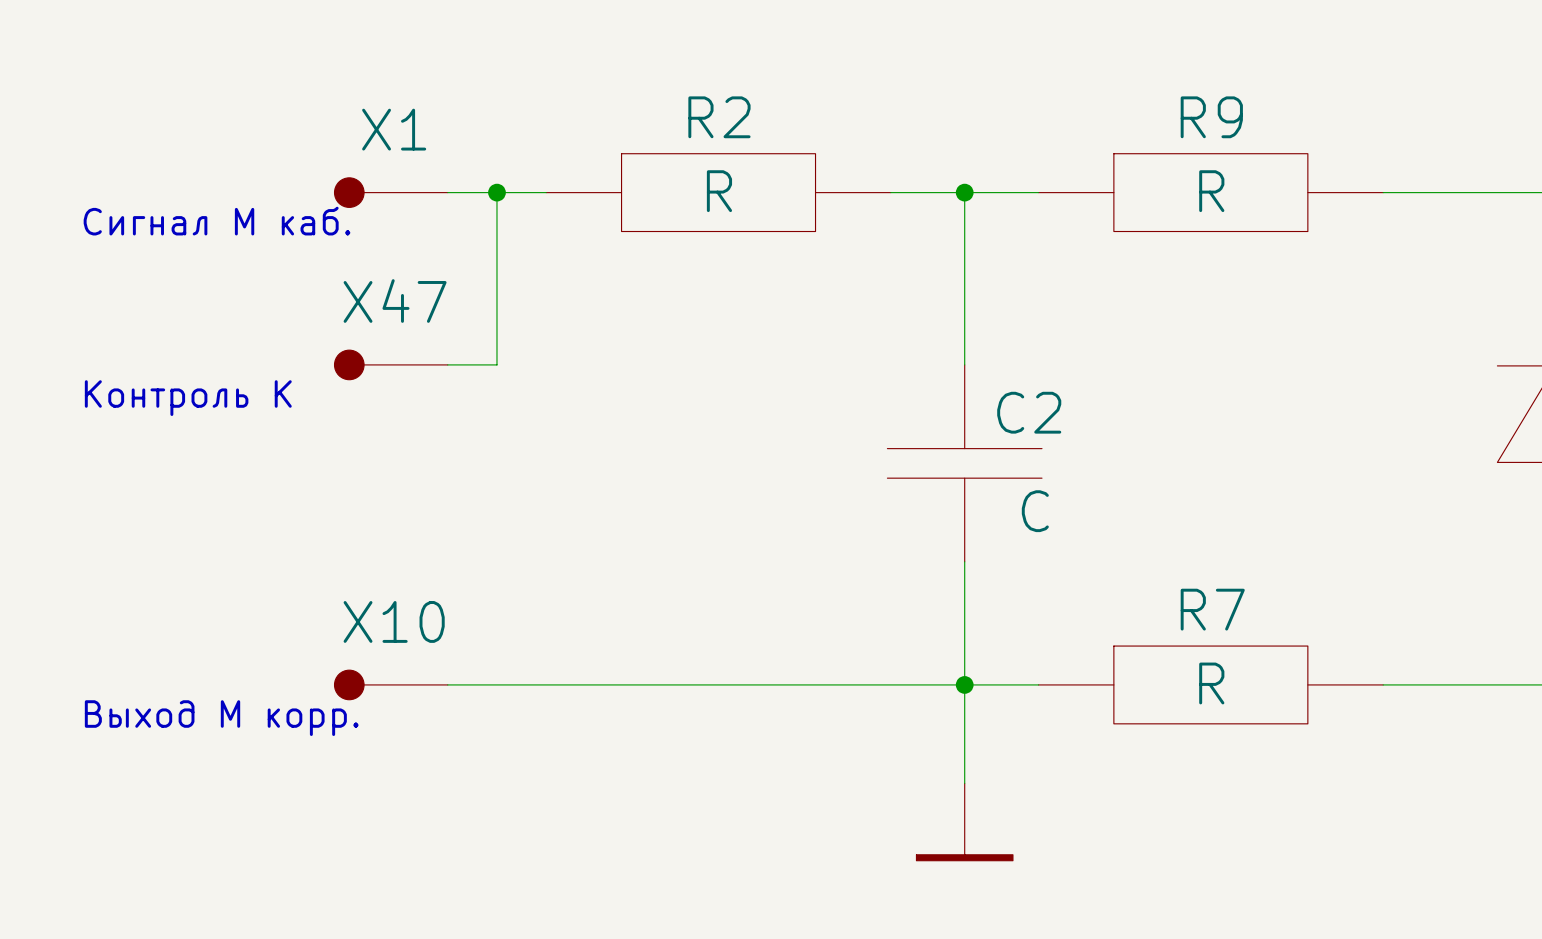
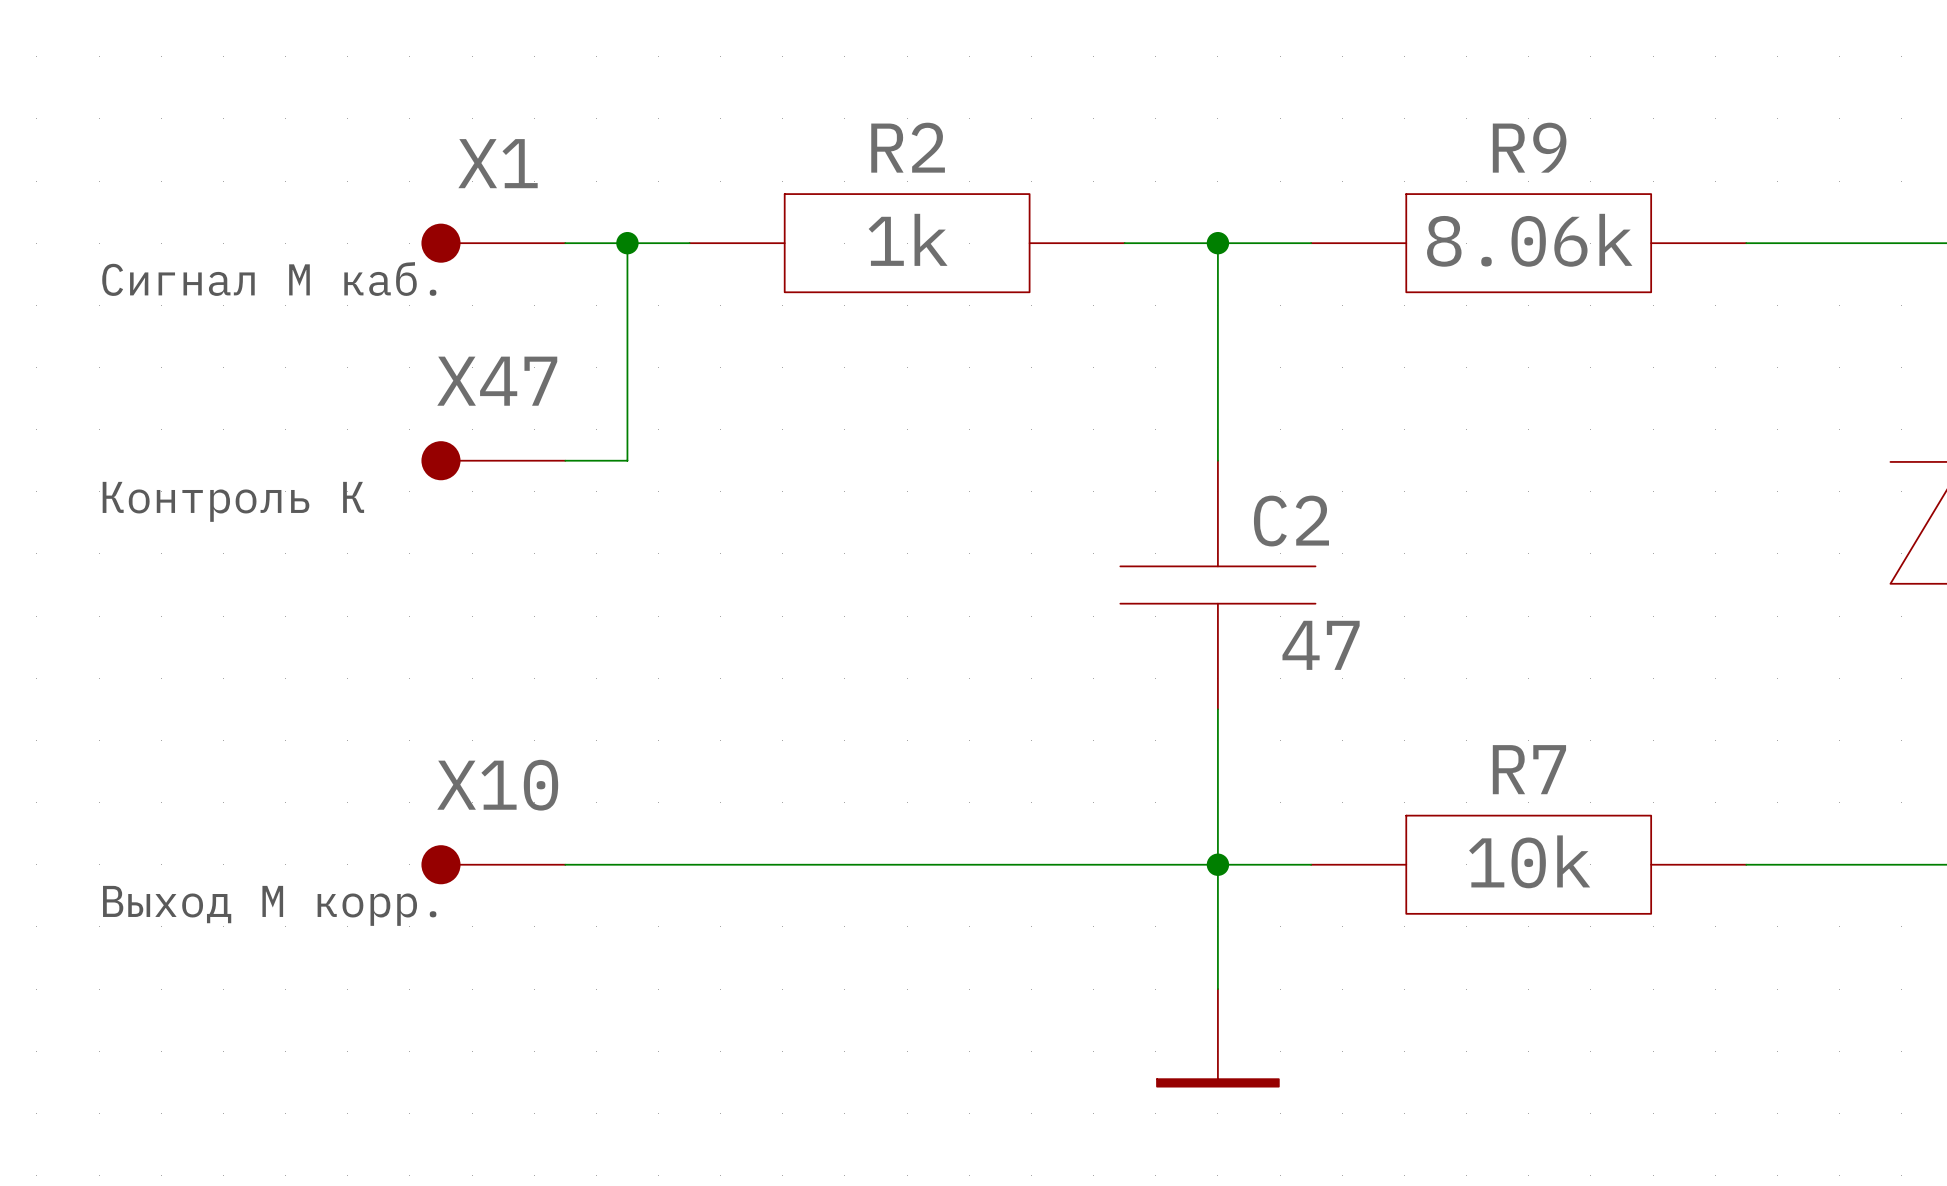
R2 value: R (719, 191) -> 1k (908, 239)
R9 value: R (1211, 191) -> 8.06k (1529, 240)
C2 value: C (1035, 511) -> 47 (1321, 645)
R7 value: R (1211, 683) -> 10k (1529, 861)

